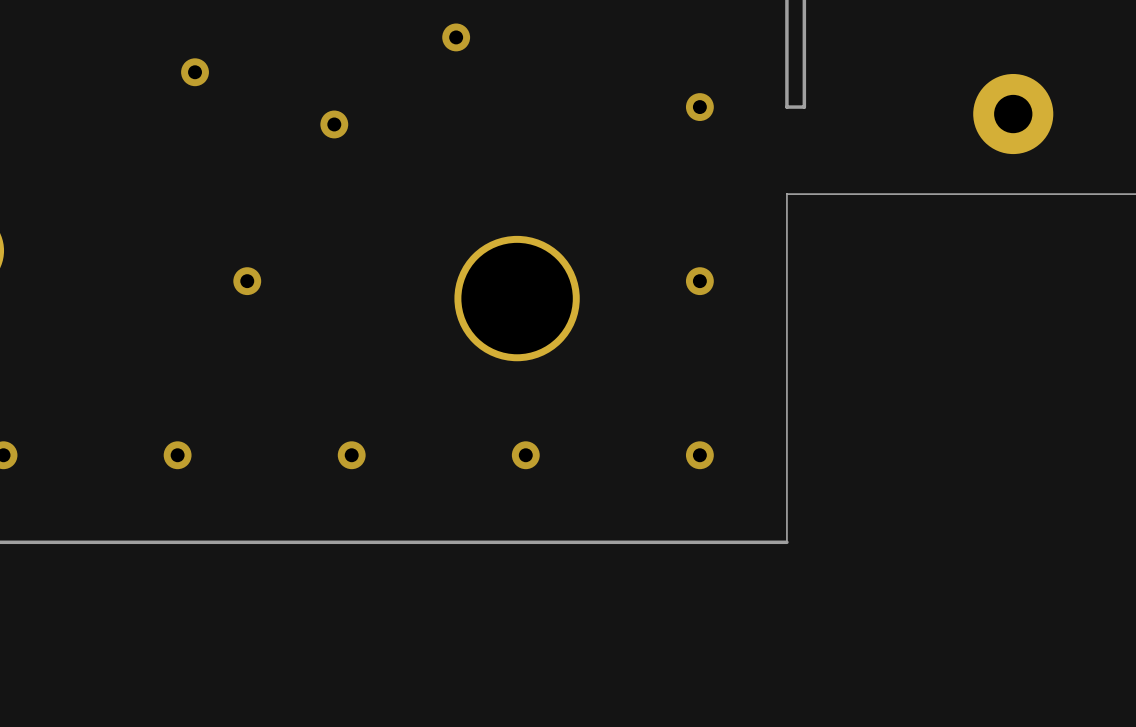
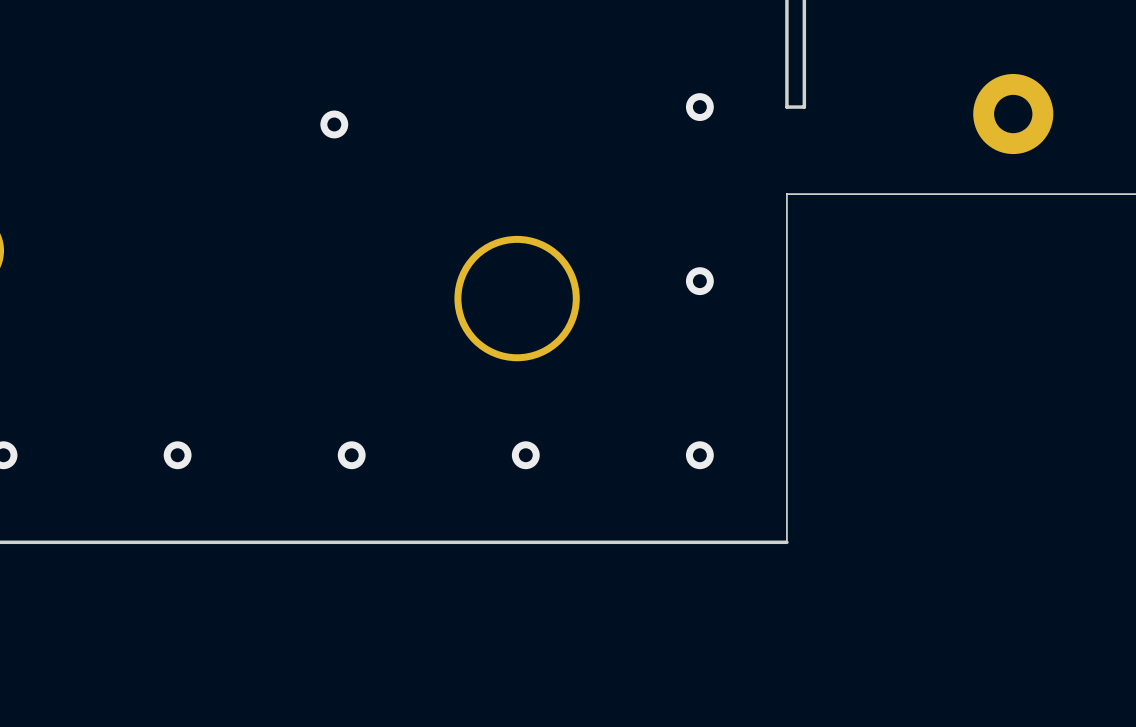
via: (456, 37) -> none
via: (195, 72) -> none
via: (247, 281) -> none

